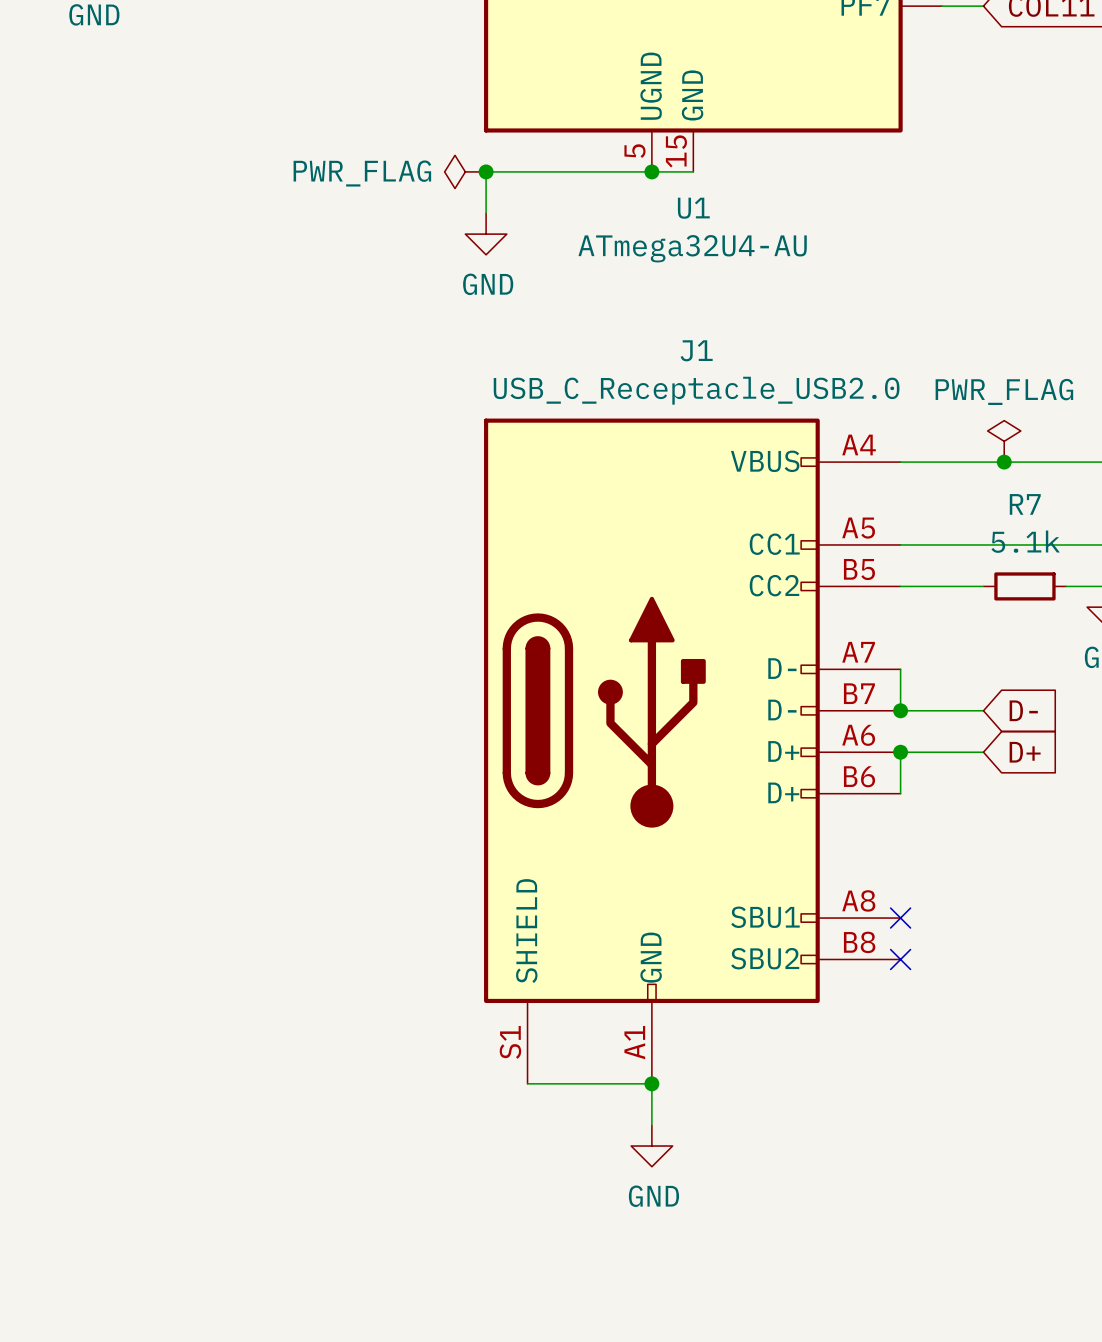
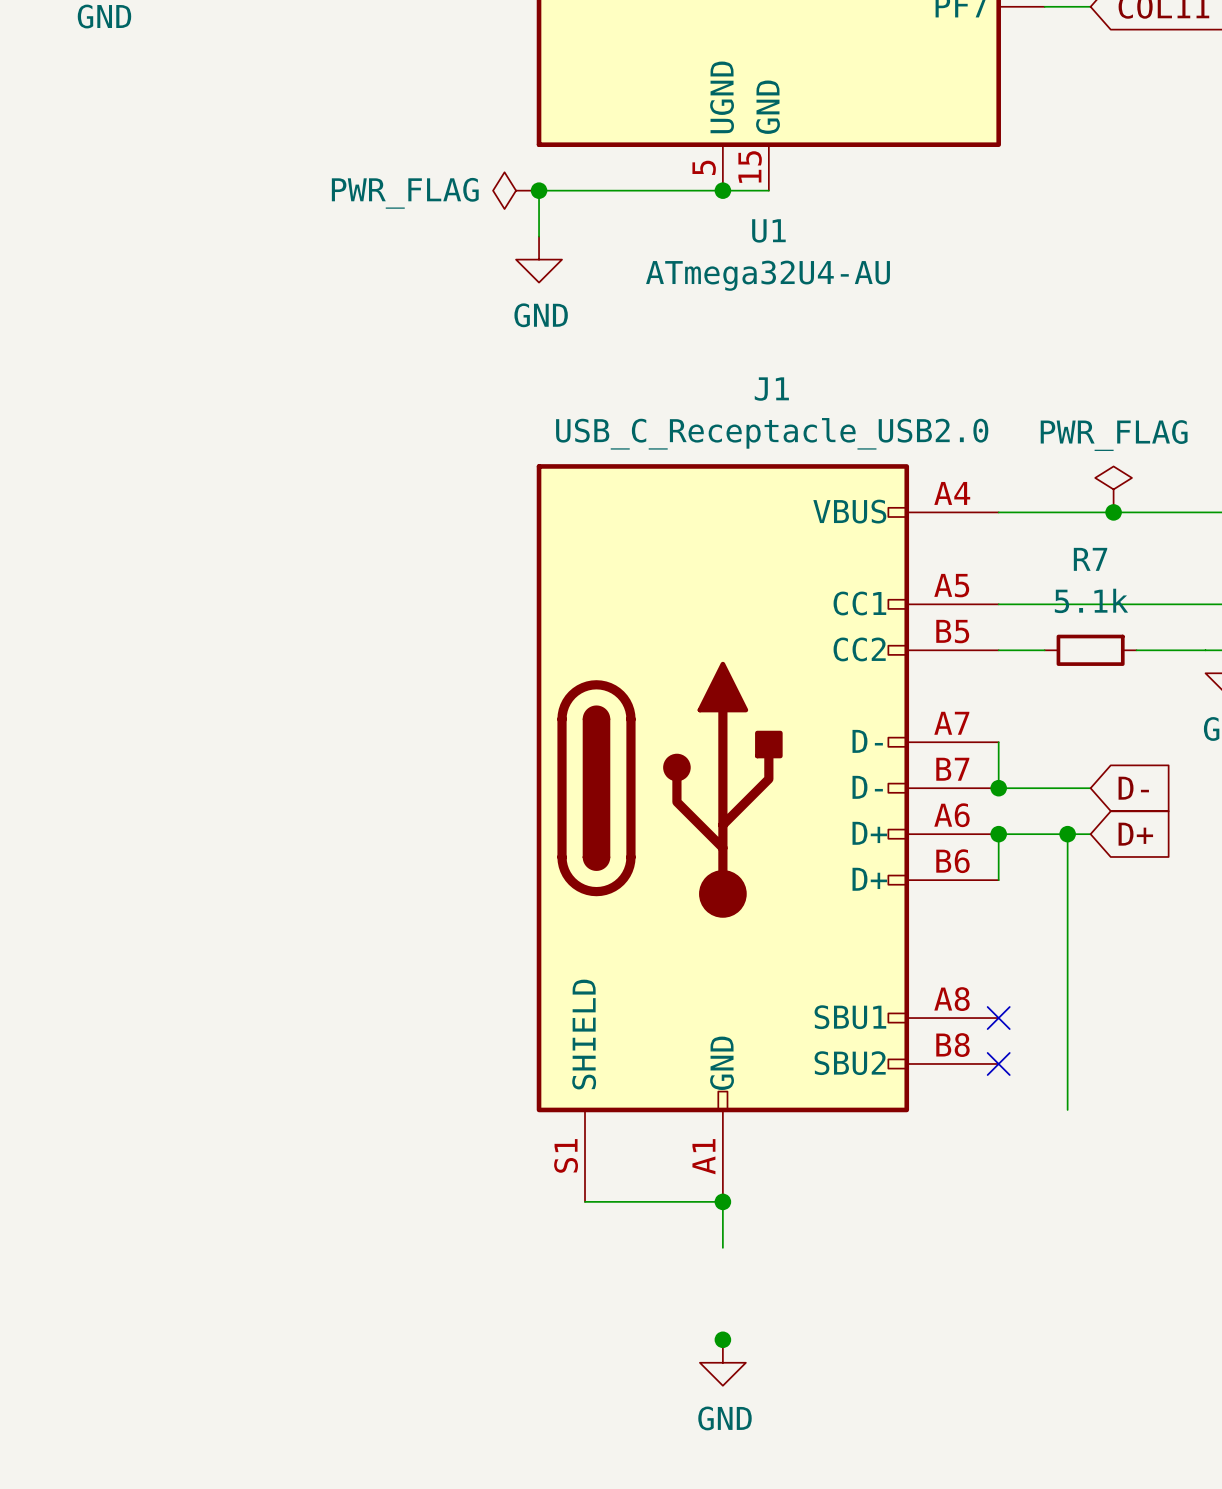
wire: (942, 586) (983, 586) -> (1136, 650) (1182, 650)
R7 position: (1024, 586) -> (1090, 650)
wire: none -> (1067, 834) (1067, 1109)
junction: none -> (1067, 834)
power symbol position: GND (651, 1146) -> GND (722, 1362)
junction: none -> (722, 1339)

